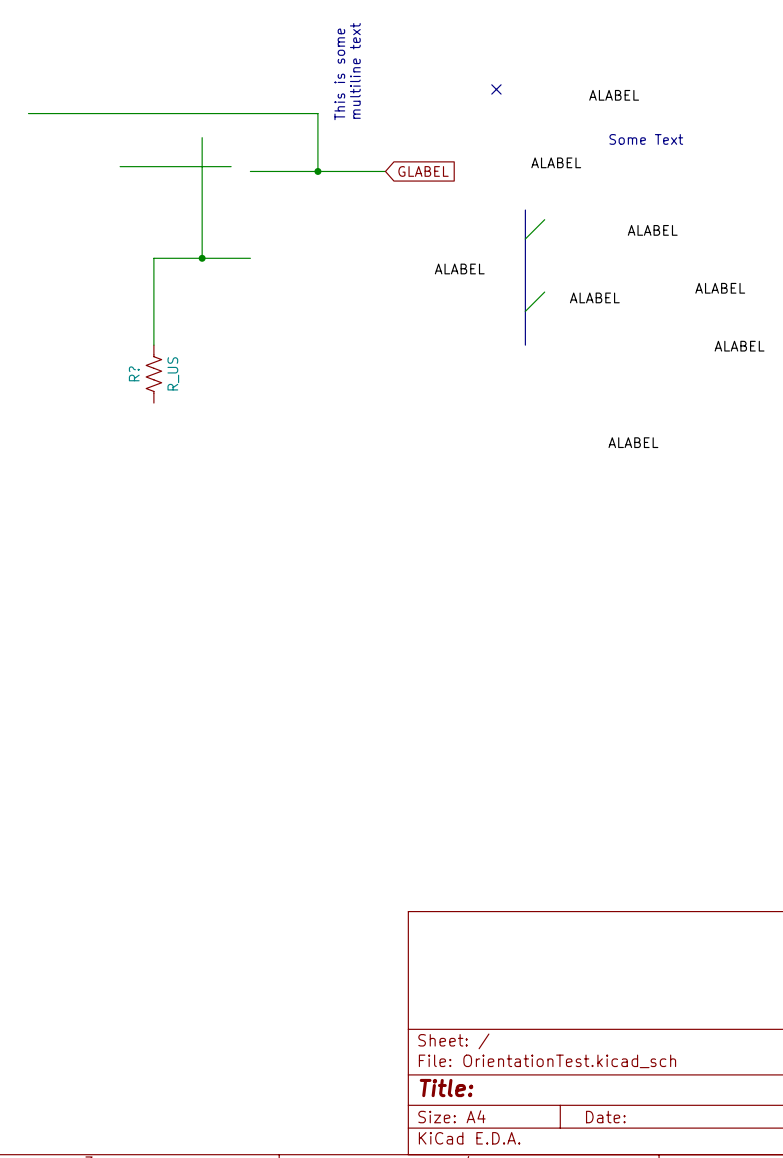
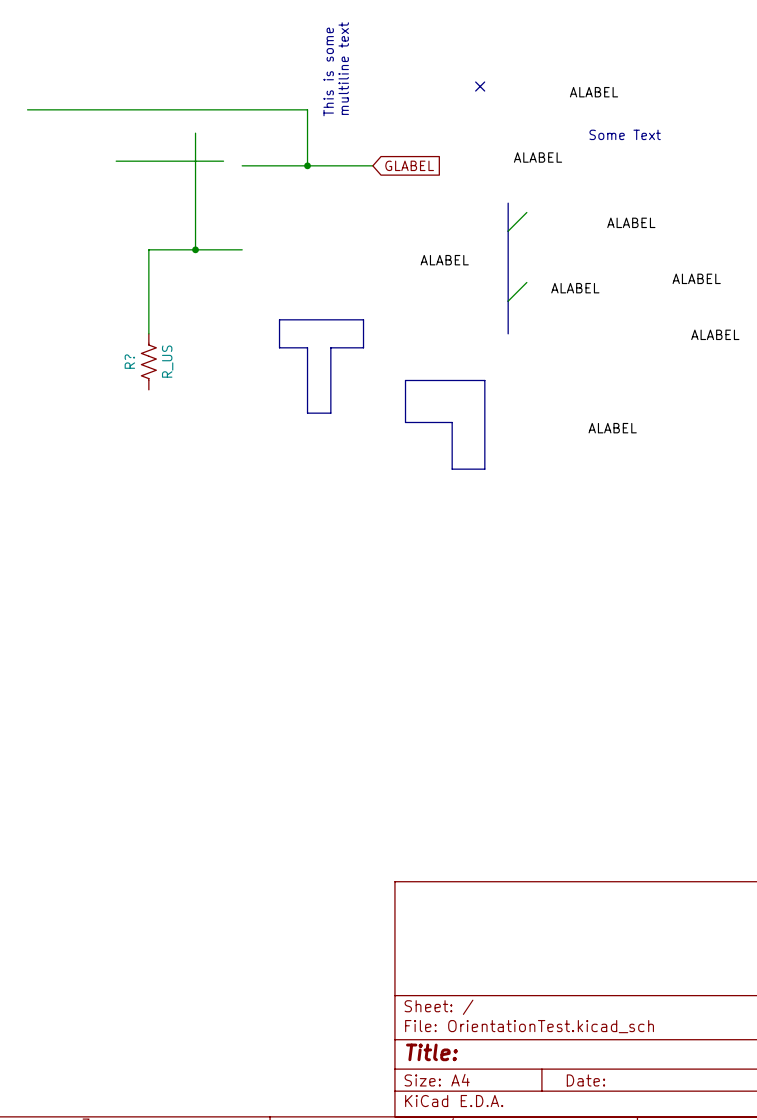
line: none -> (279, 319) (363, 319) (363, 347) (330, 347) (330, 413) (307, 413) (307, 347) (279, 347) (279, 319)
line: none -> (405, 380) (405, 422) (452, 422) (452, 469) (484, 469) (484, 380) (405, 380)

